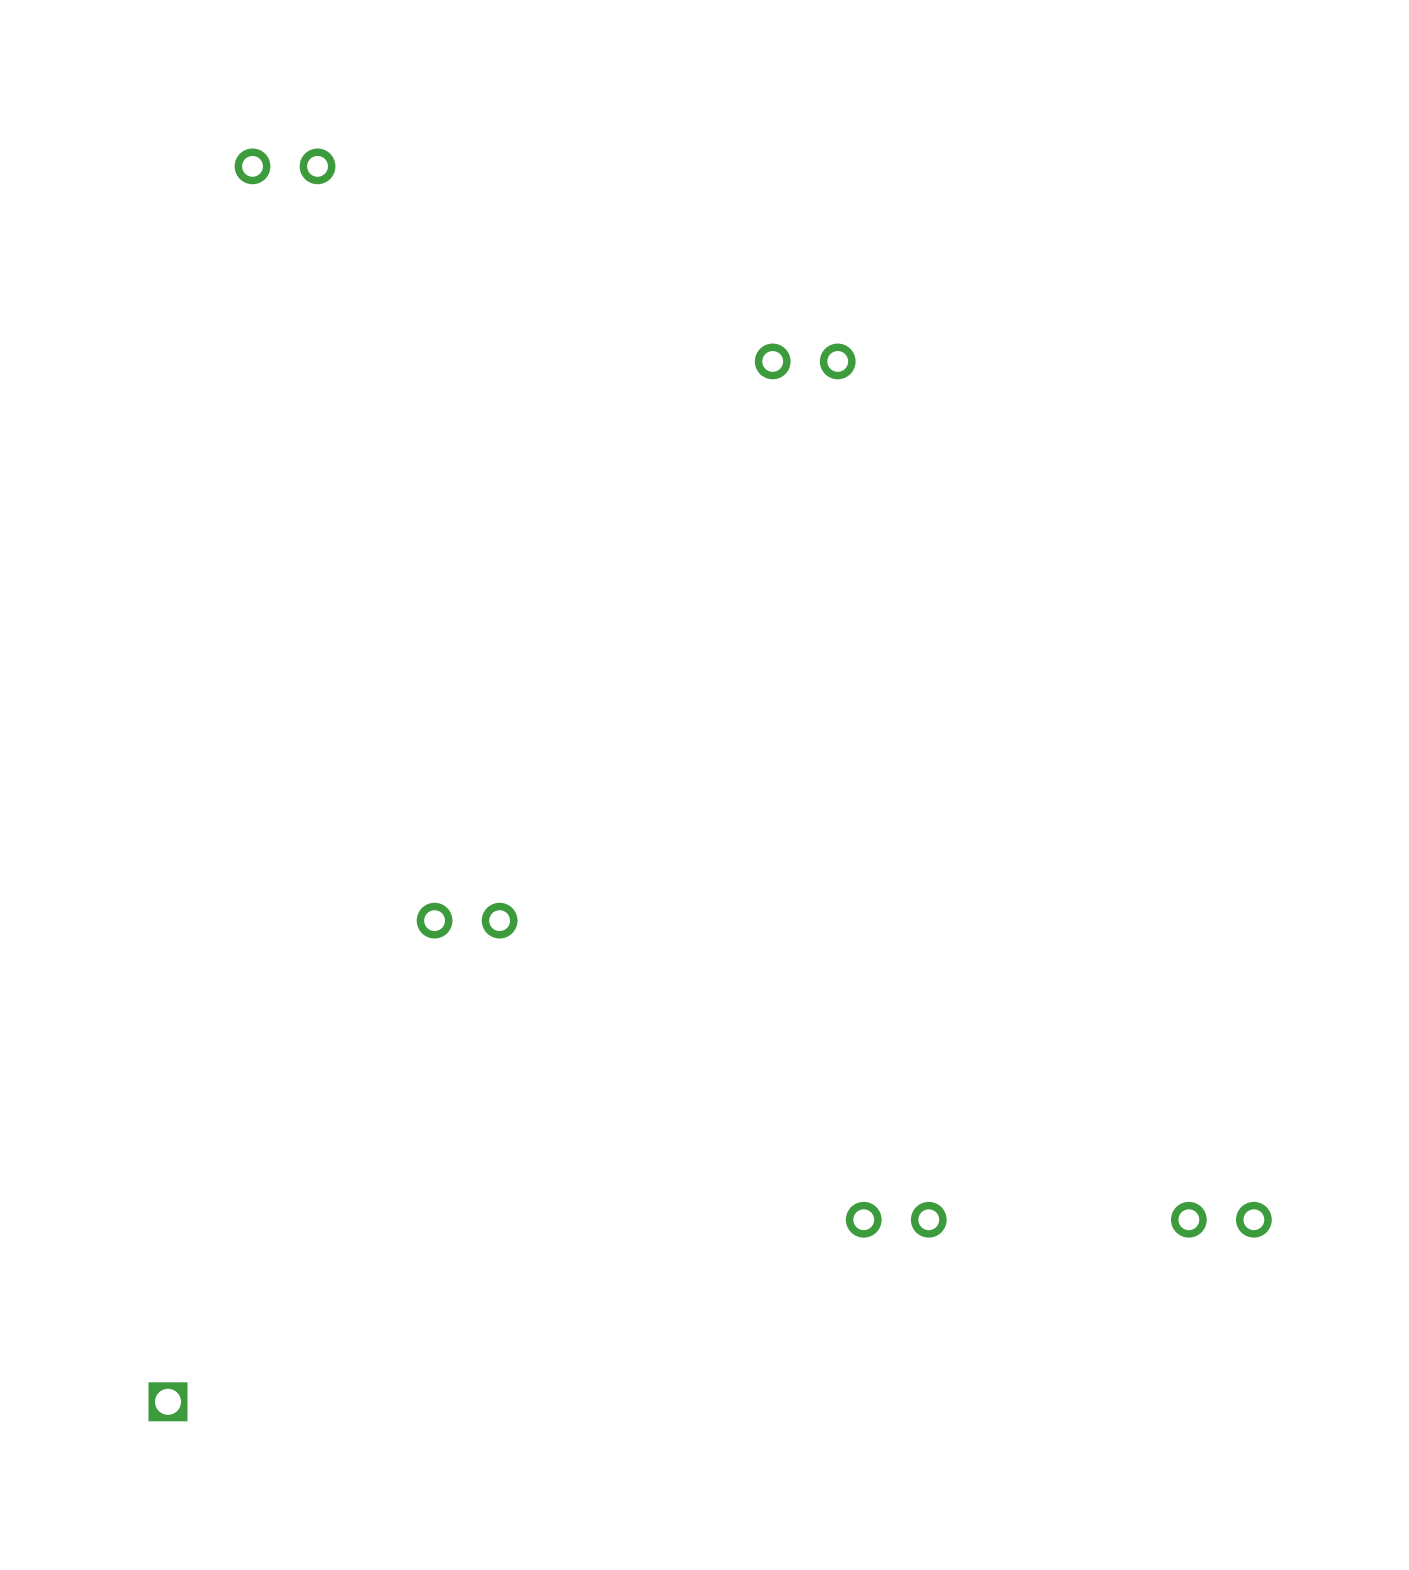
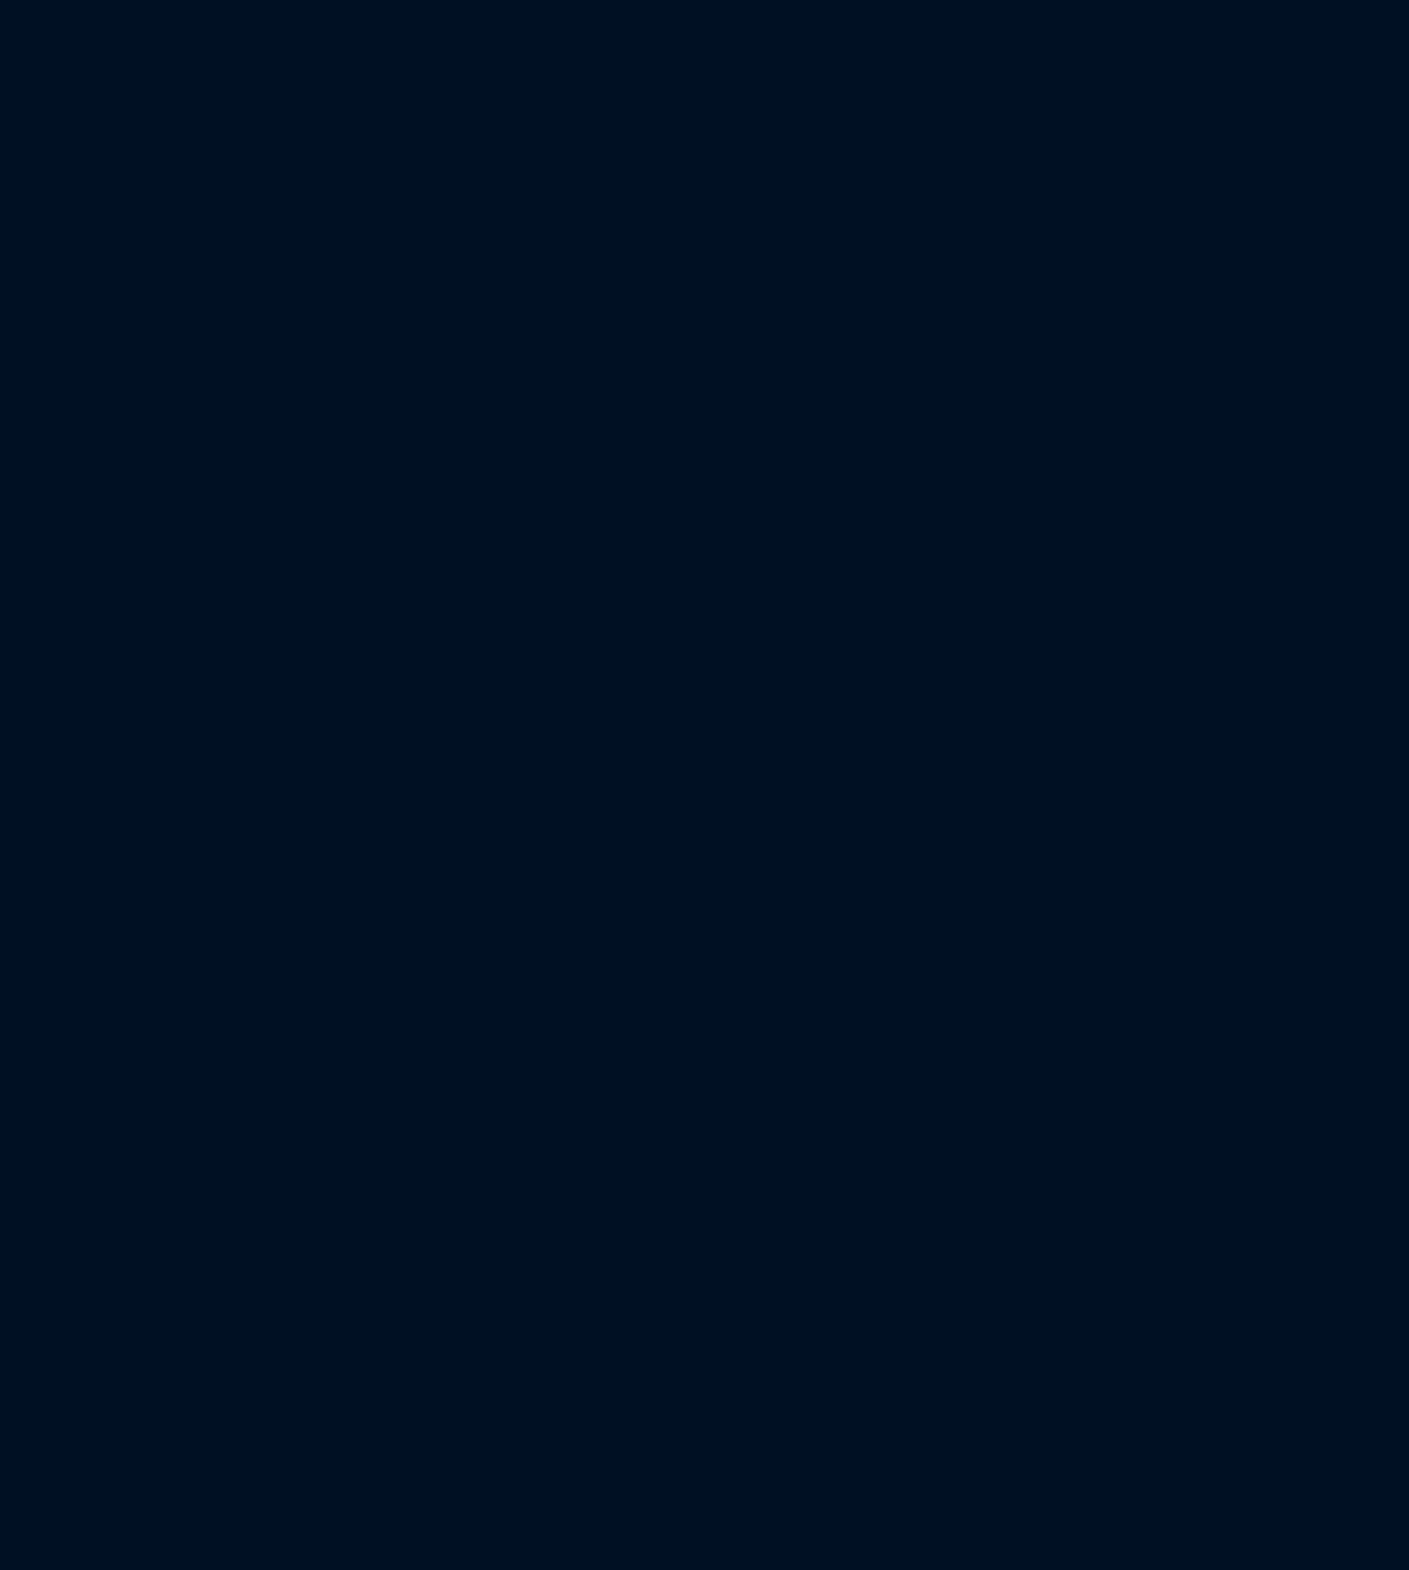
part: (285, 166) -> none
part: (805, 361) -> none
part: (467, 920) -> none
part: (896, 1219) -> none
part: (1221, 1219) -> none
part: (167, 1401) -> none

